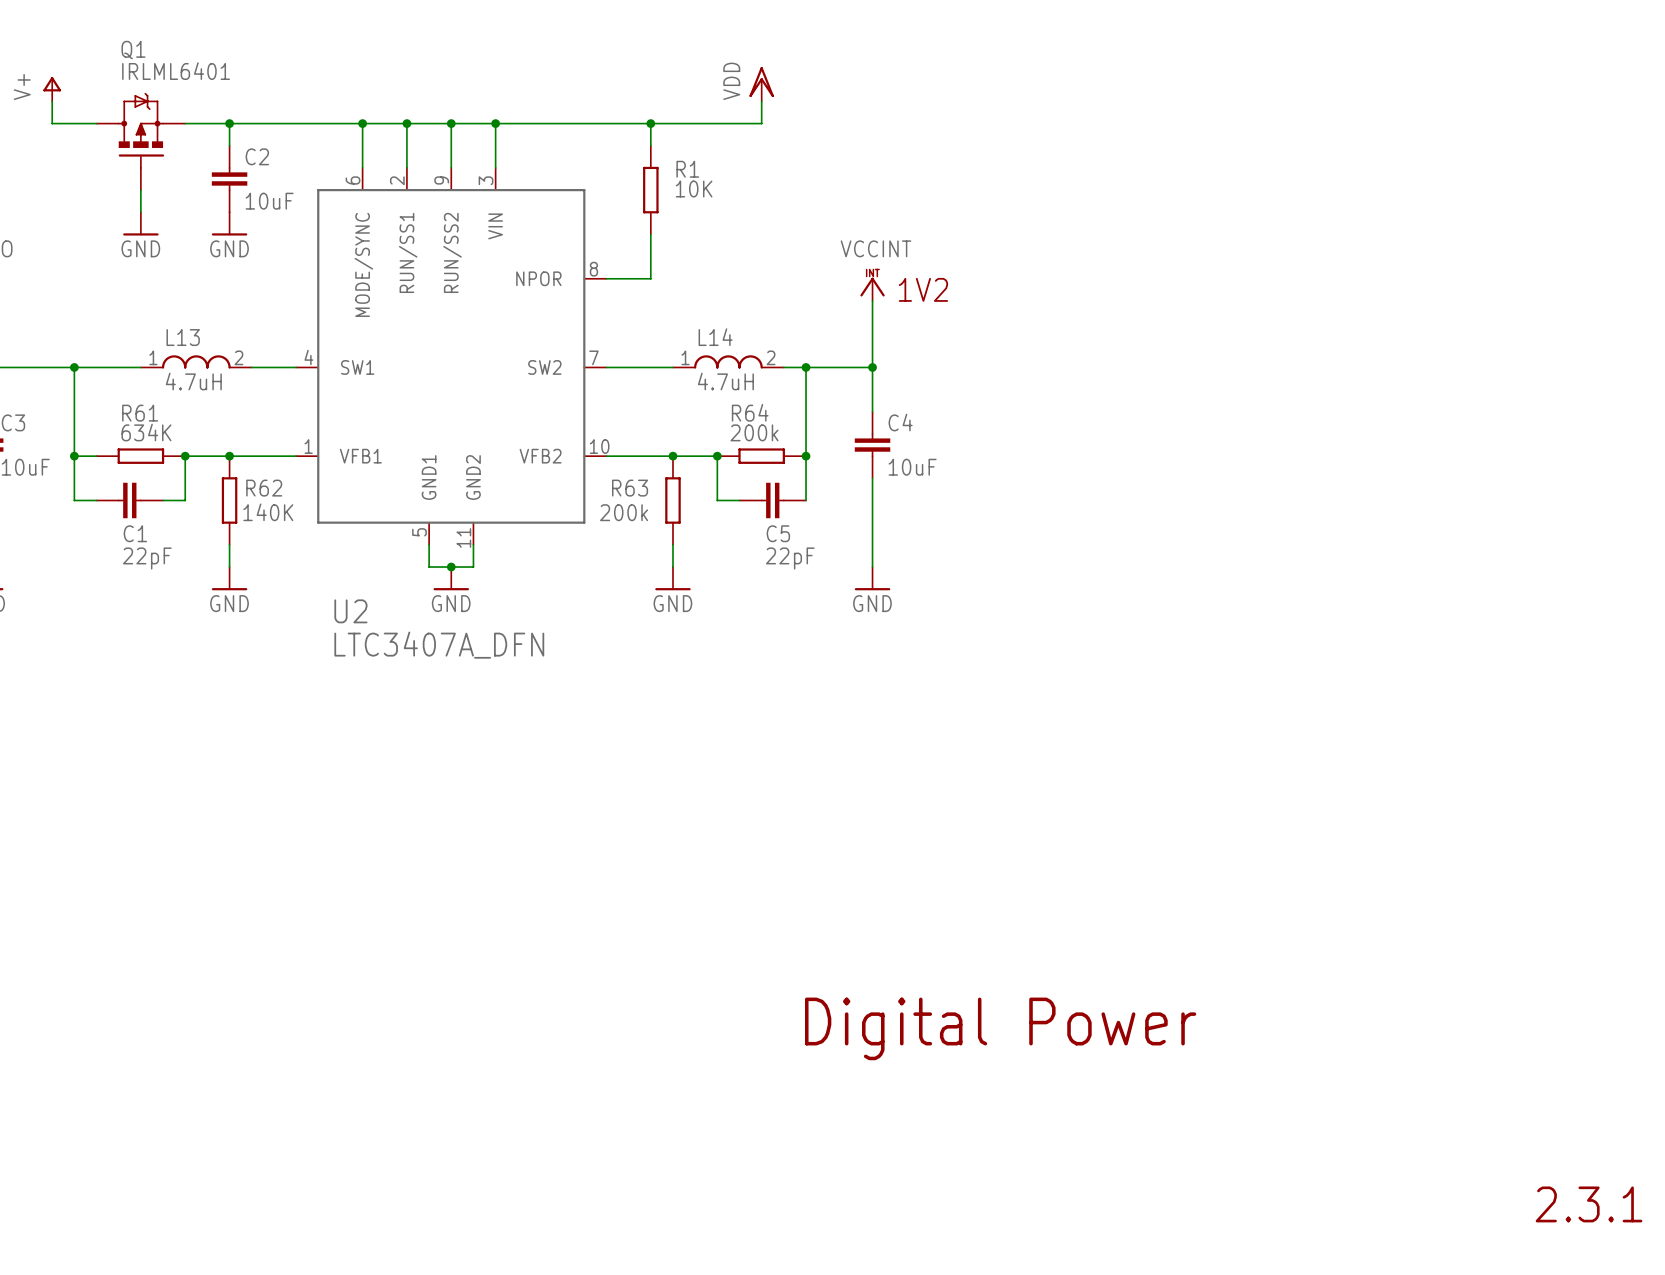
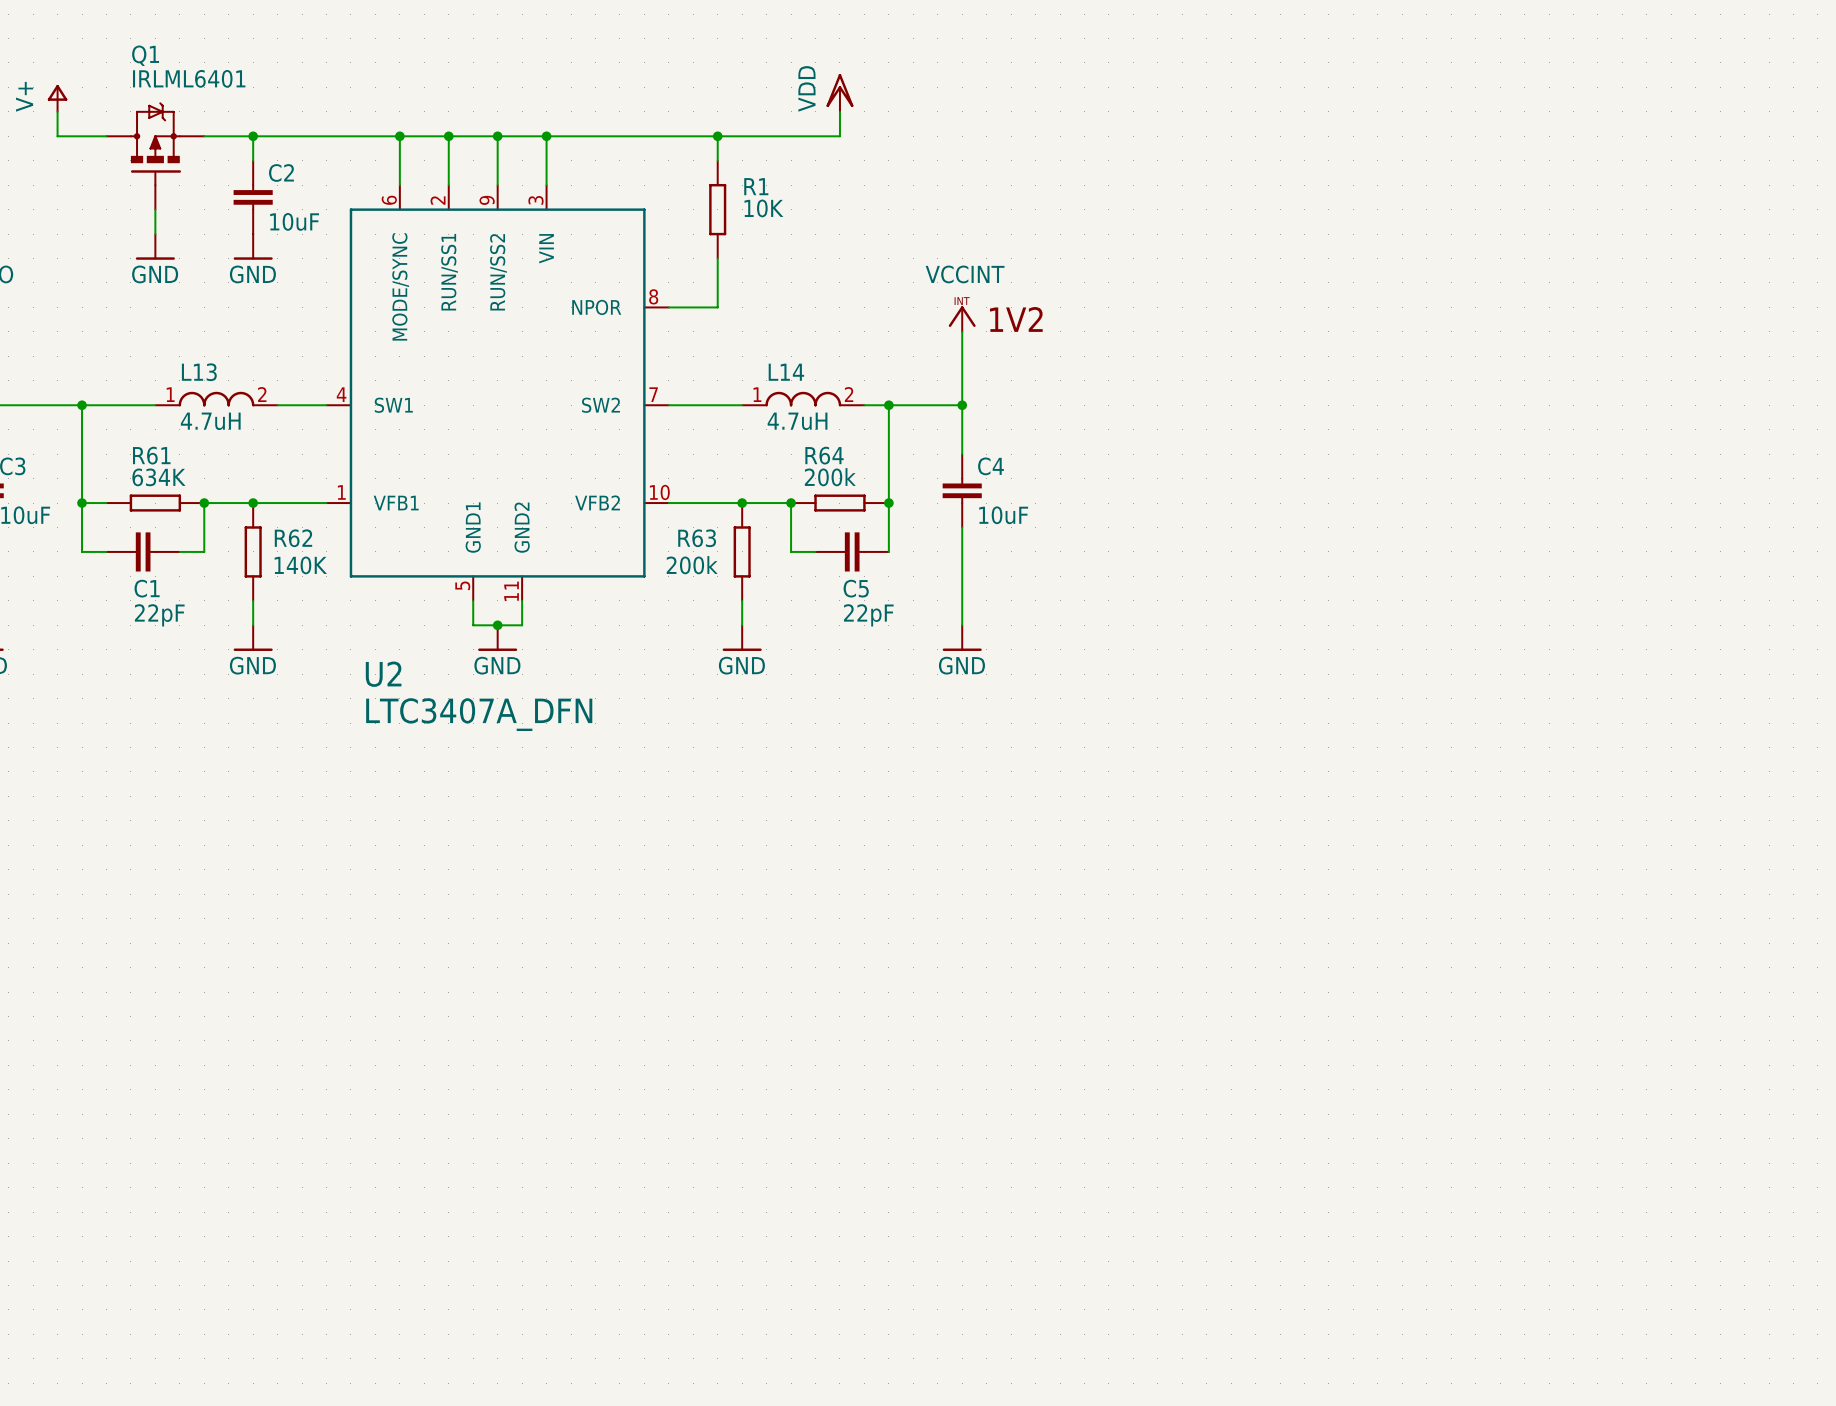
text: Digital Power (1000, 1028) -> none
text: 2.3.1 (1589, 1204) -> none

